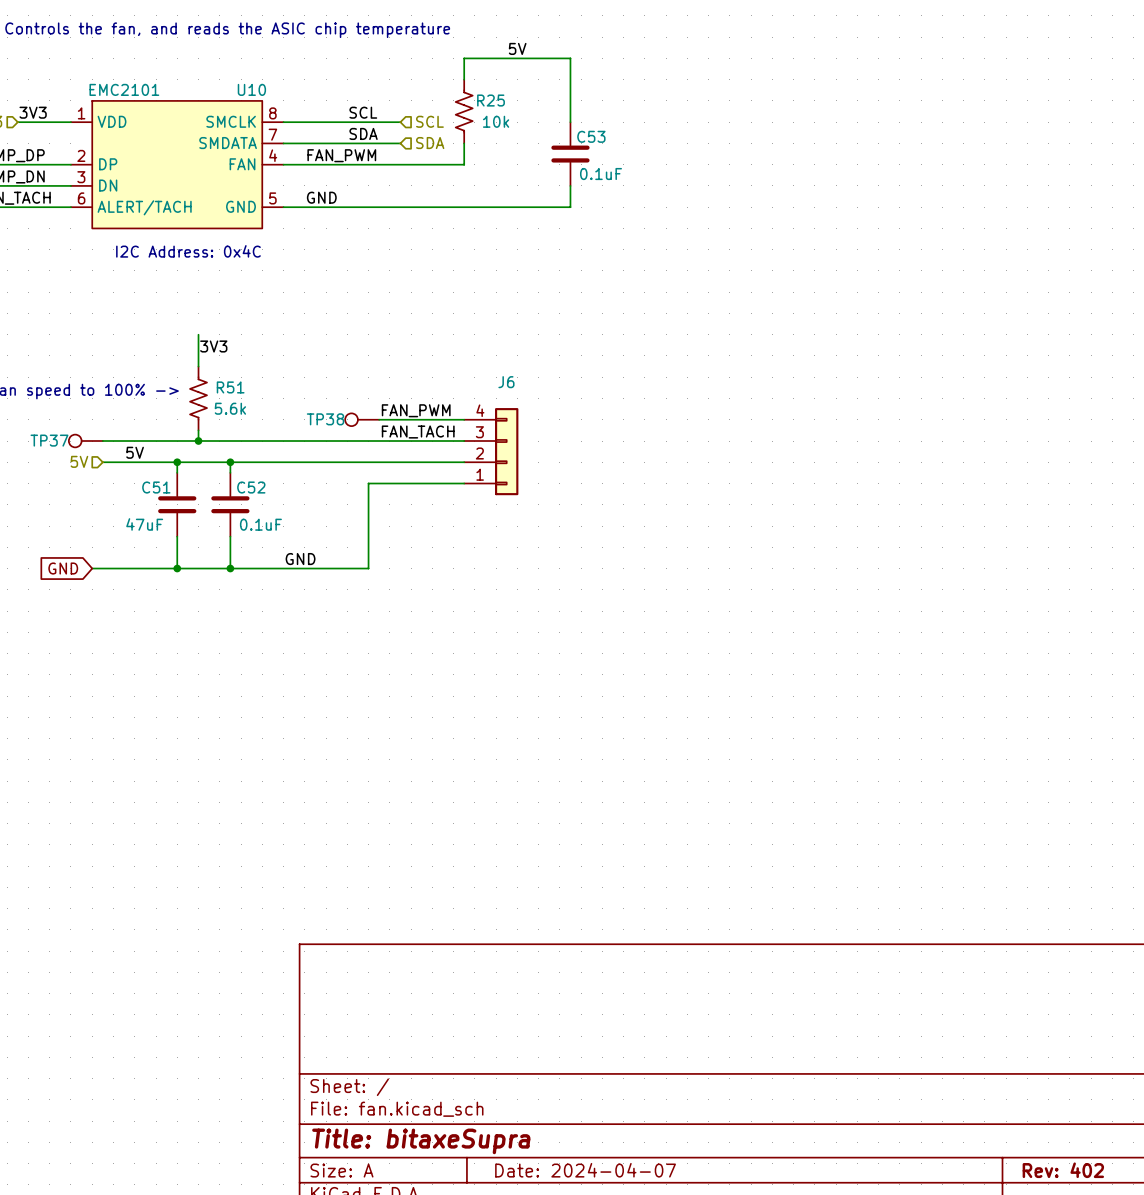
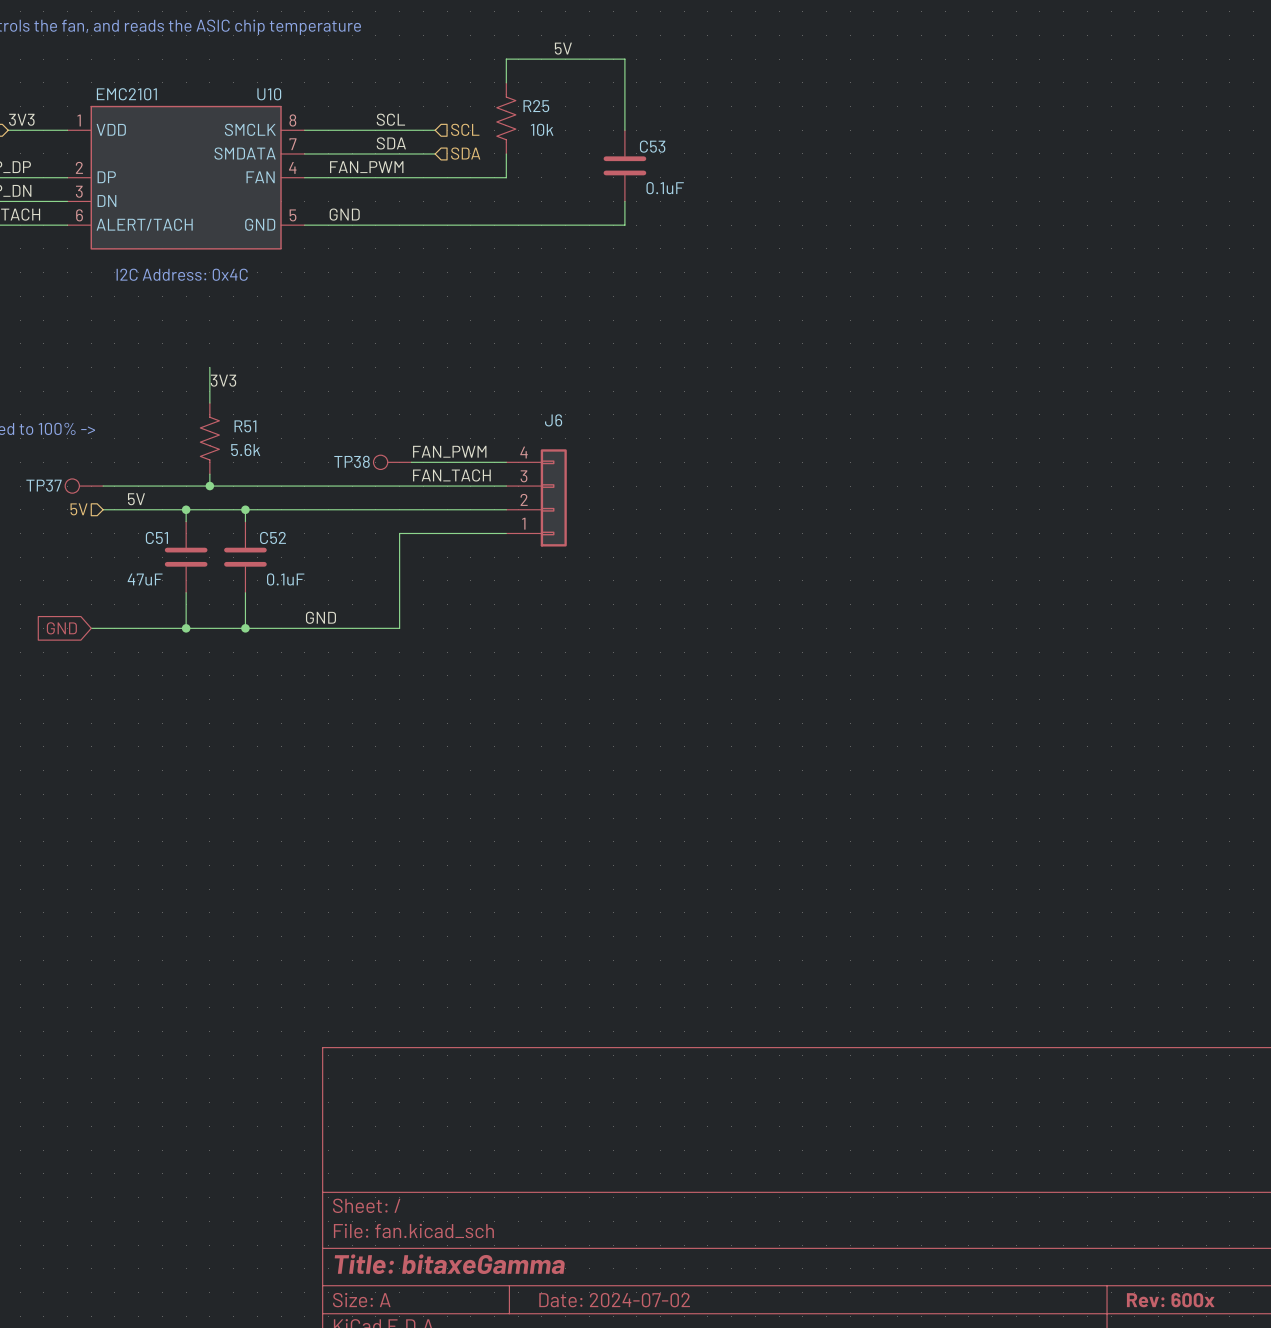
title block: Title: bitaxeSupra (421, 1141) -> Title: bitaxeGamma (449, 1264)
title block: Date: 2024-04-07 (585, 1170) -> Date: 2024-07-02 (614, 1300)
title block: Rev: 402 (1063, 1170) -> Rev: 600x (1170, 1300)

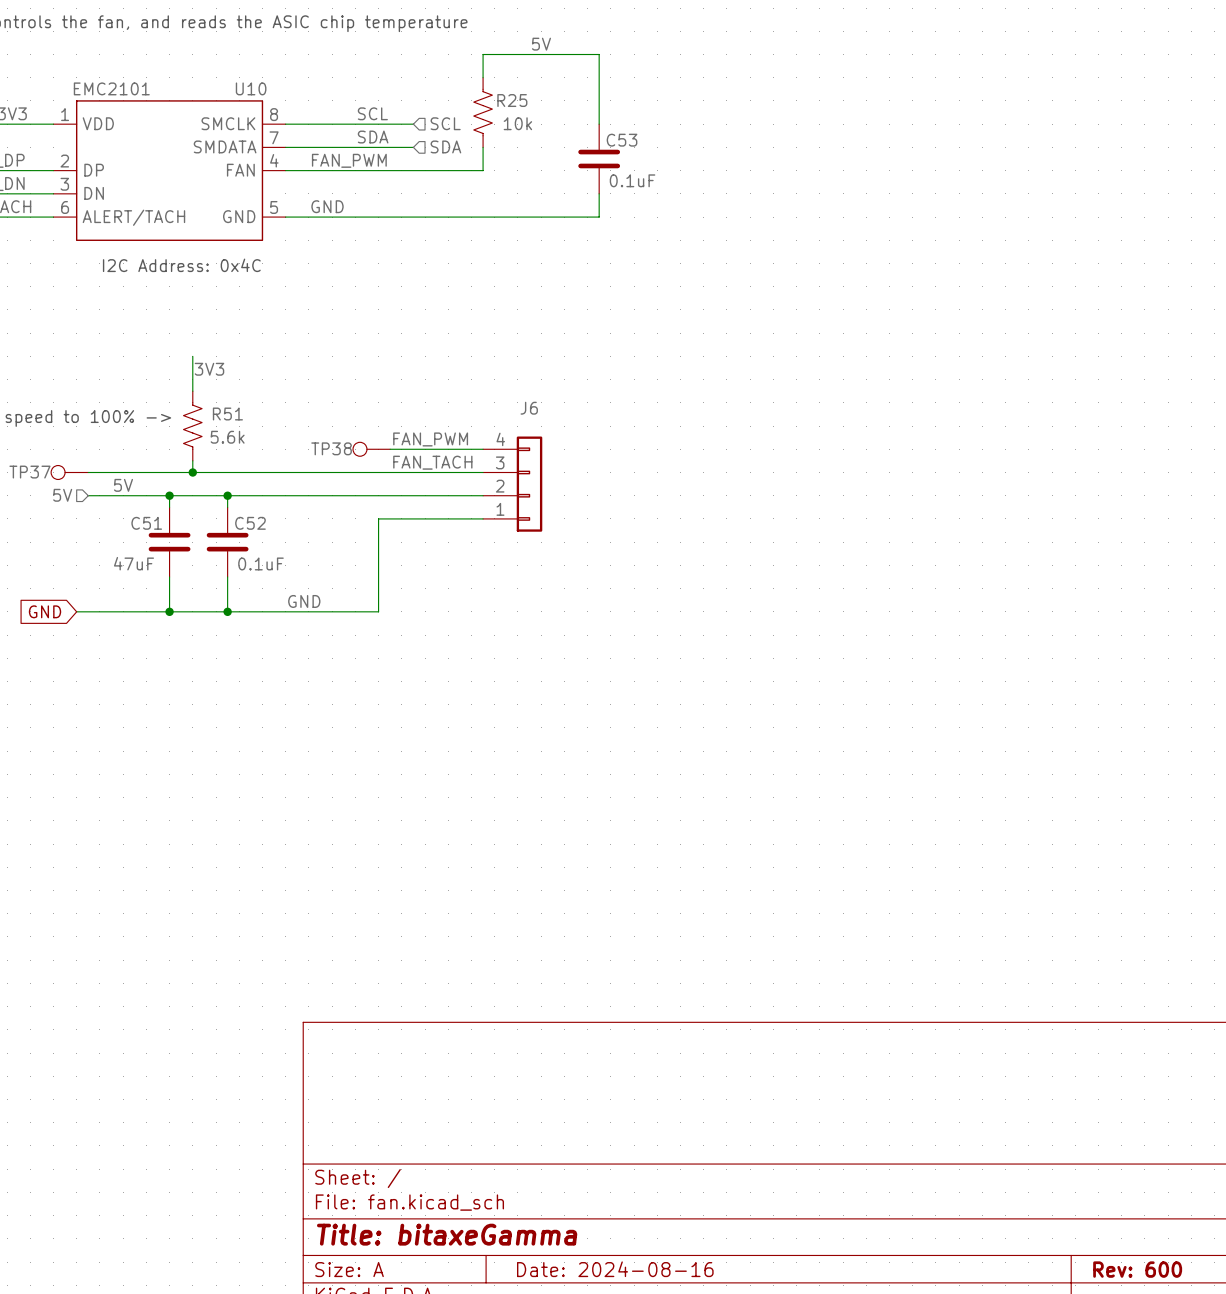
title block: Date: 2024-07-02 (614, 1300) -> Date: 2024-08-16 (615, 1269)
title block: Rev: 600x (1170, 1300) -> Rev: 600 (1137, 1269)

